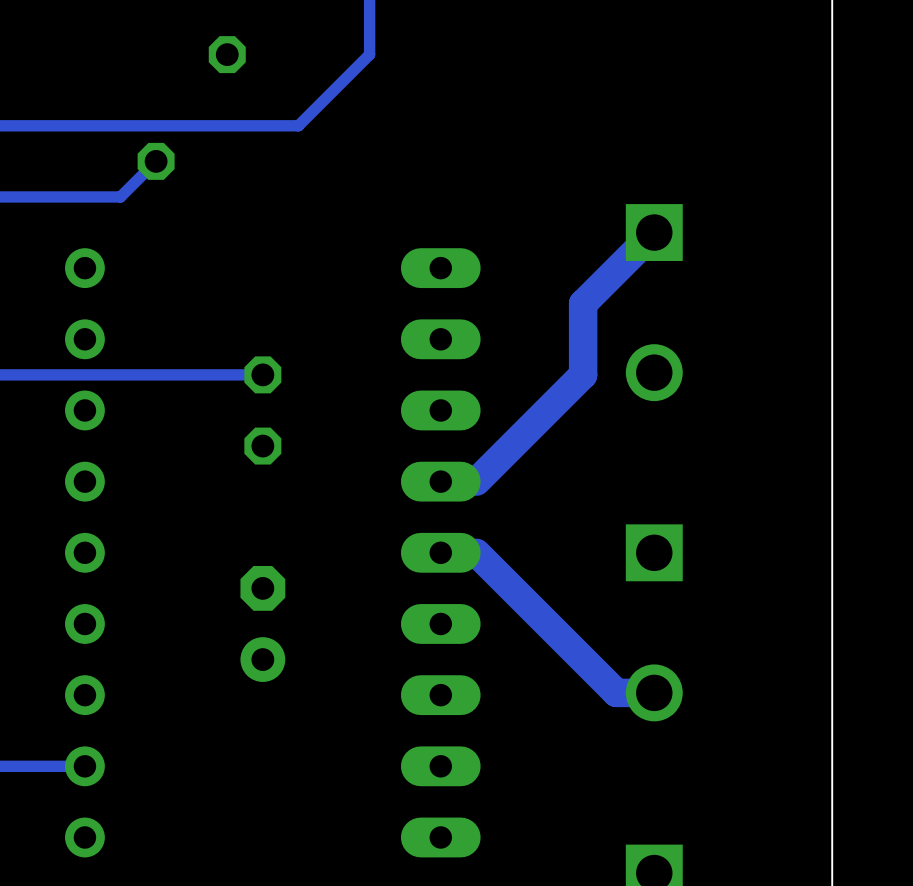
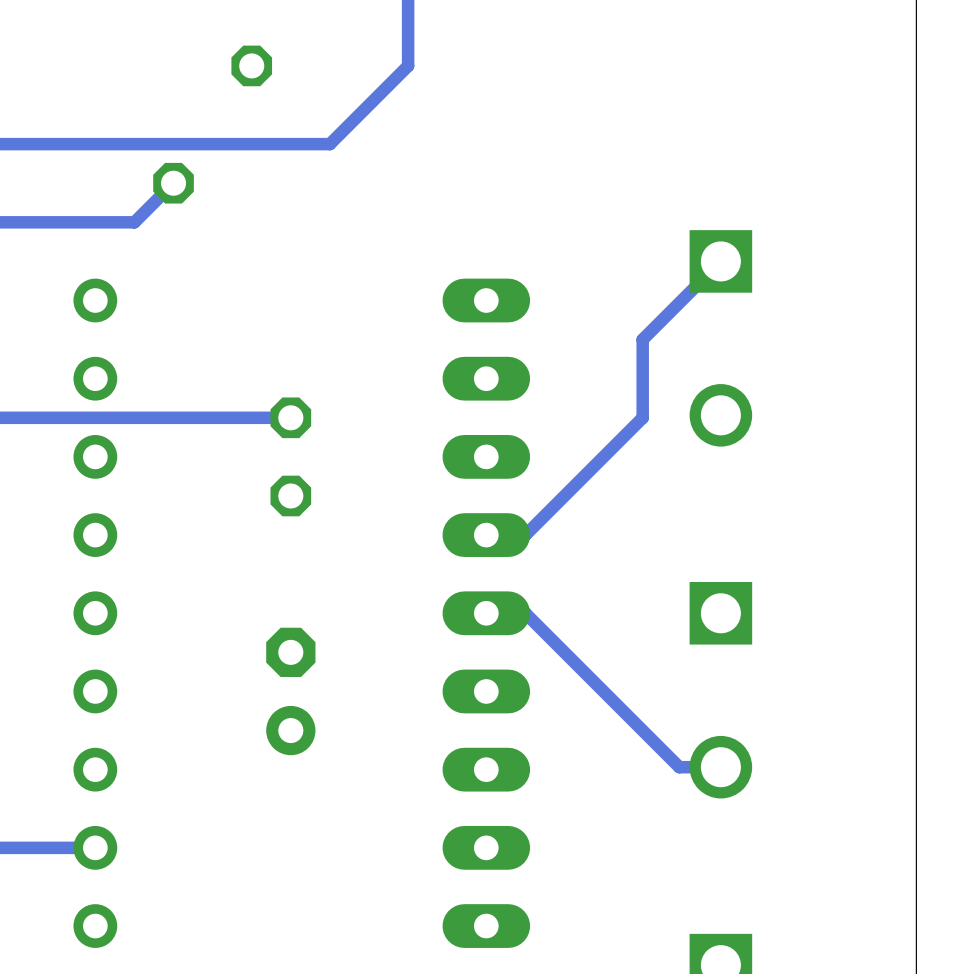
track width: thick (654, 232) (583, 303) (583, 374) (476, 481) -> thin (720, 261) (642, 339) (642, 417) (525, 535)
track width: thick (476, 552) (616, 692) (654, 692) -> thin (525, 613) (679, 767) (720, 767)

